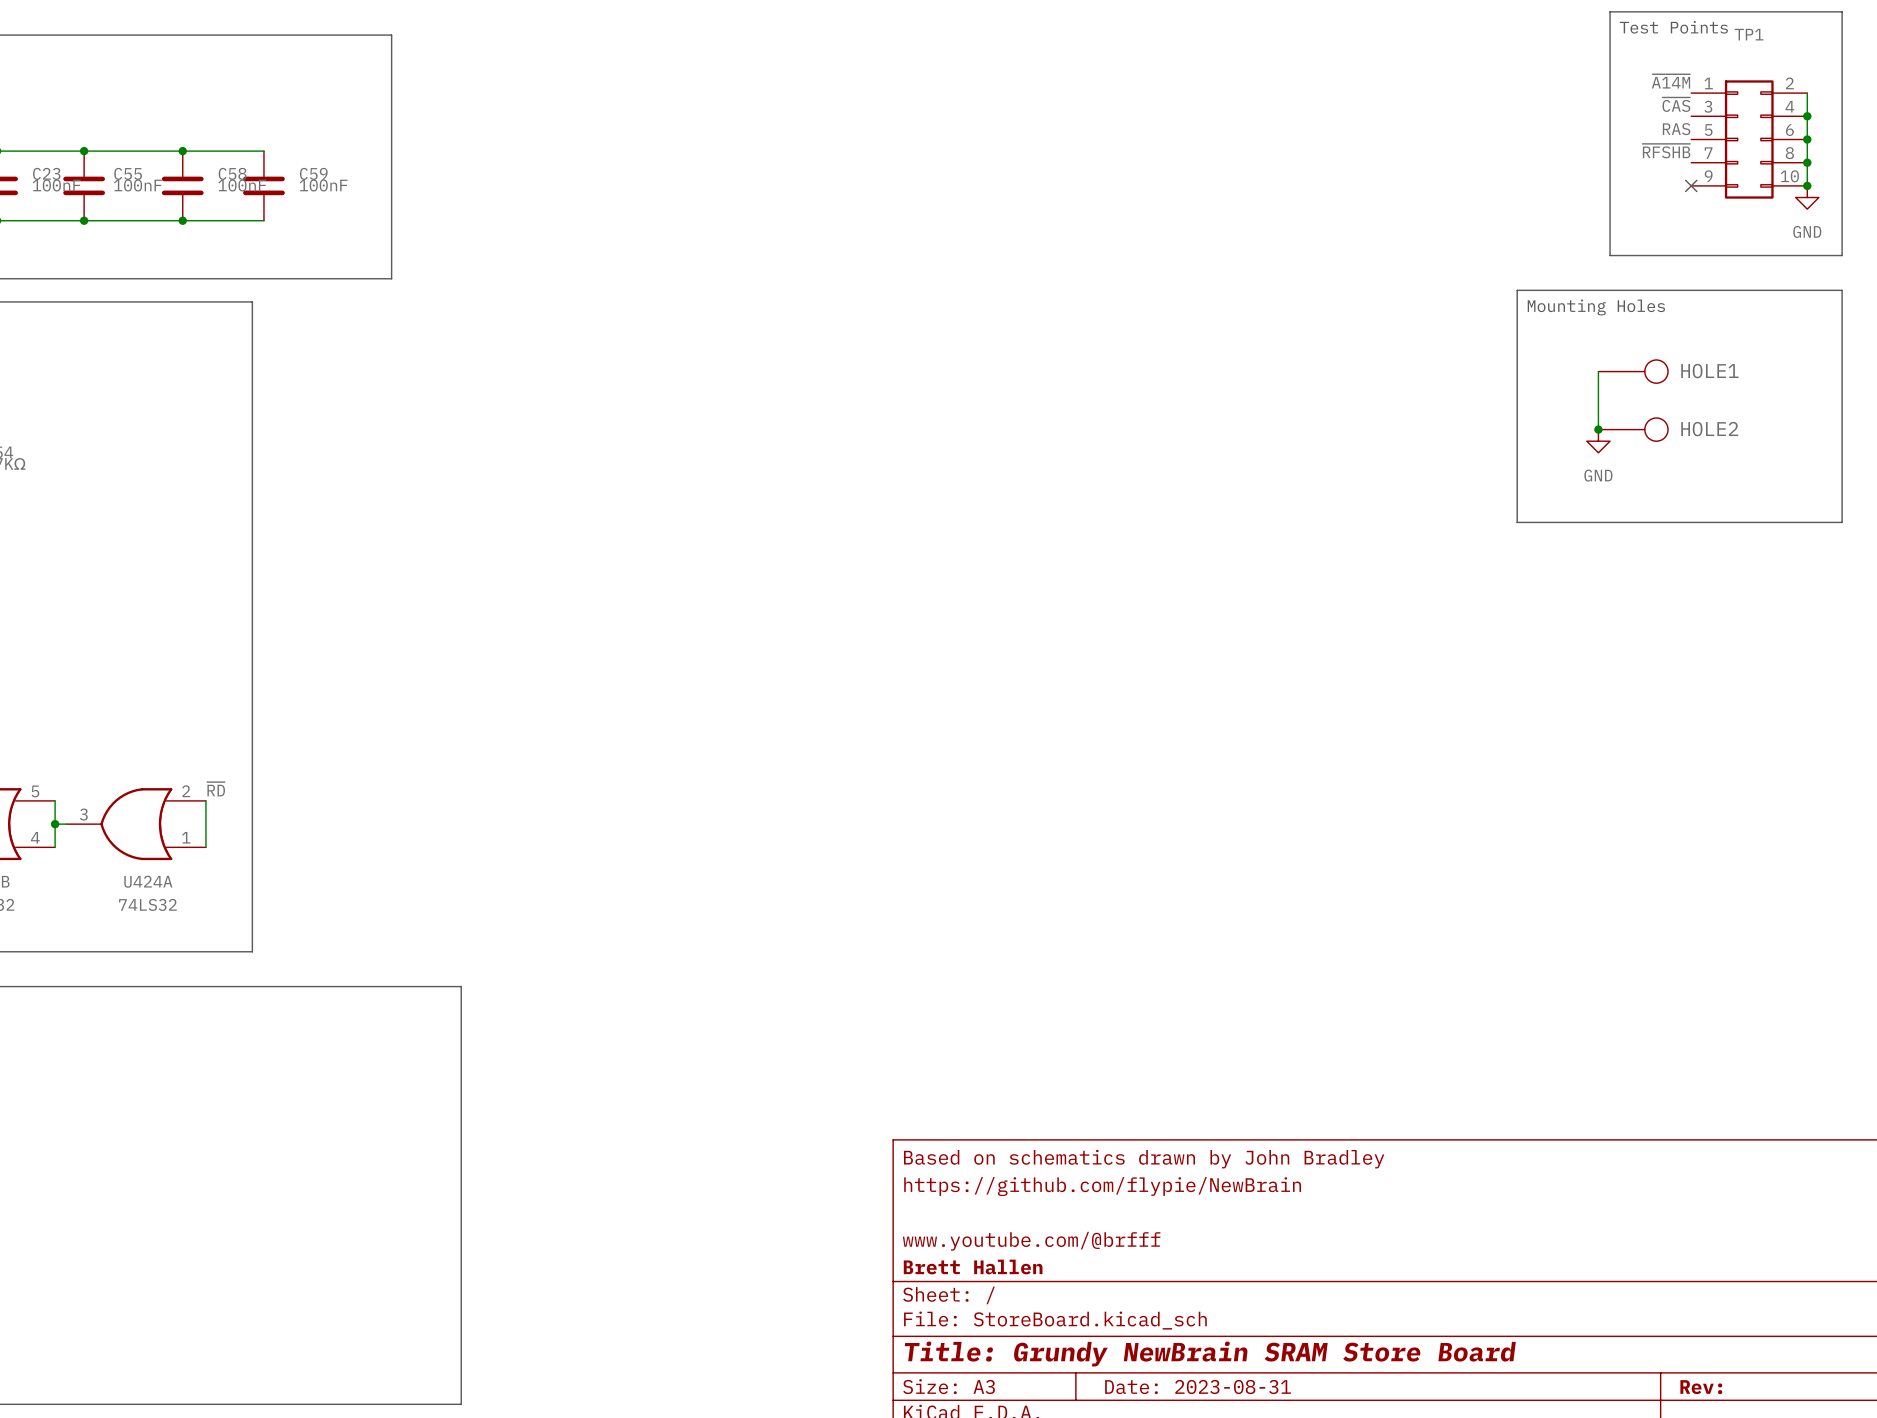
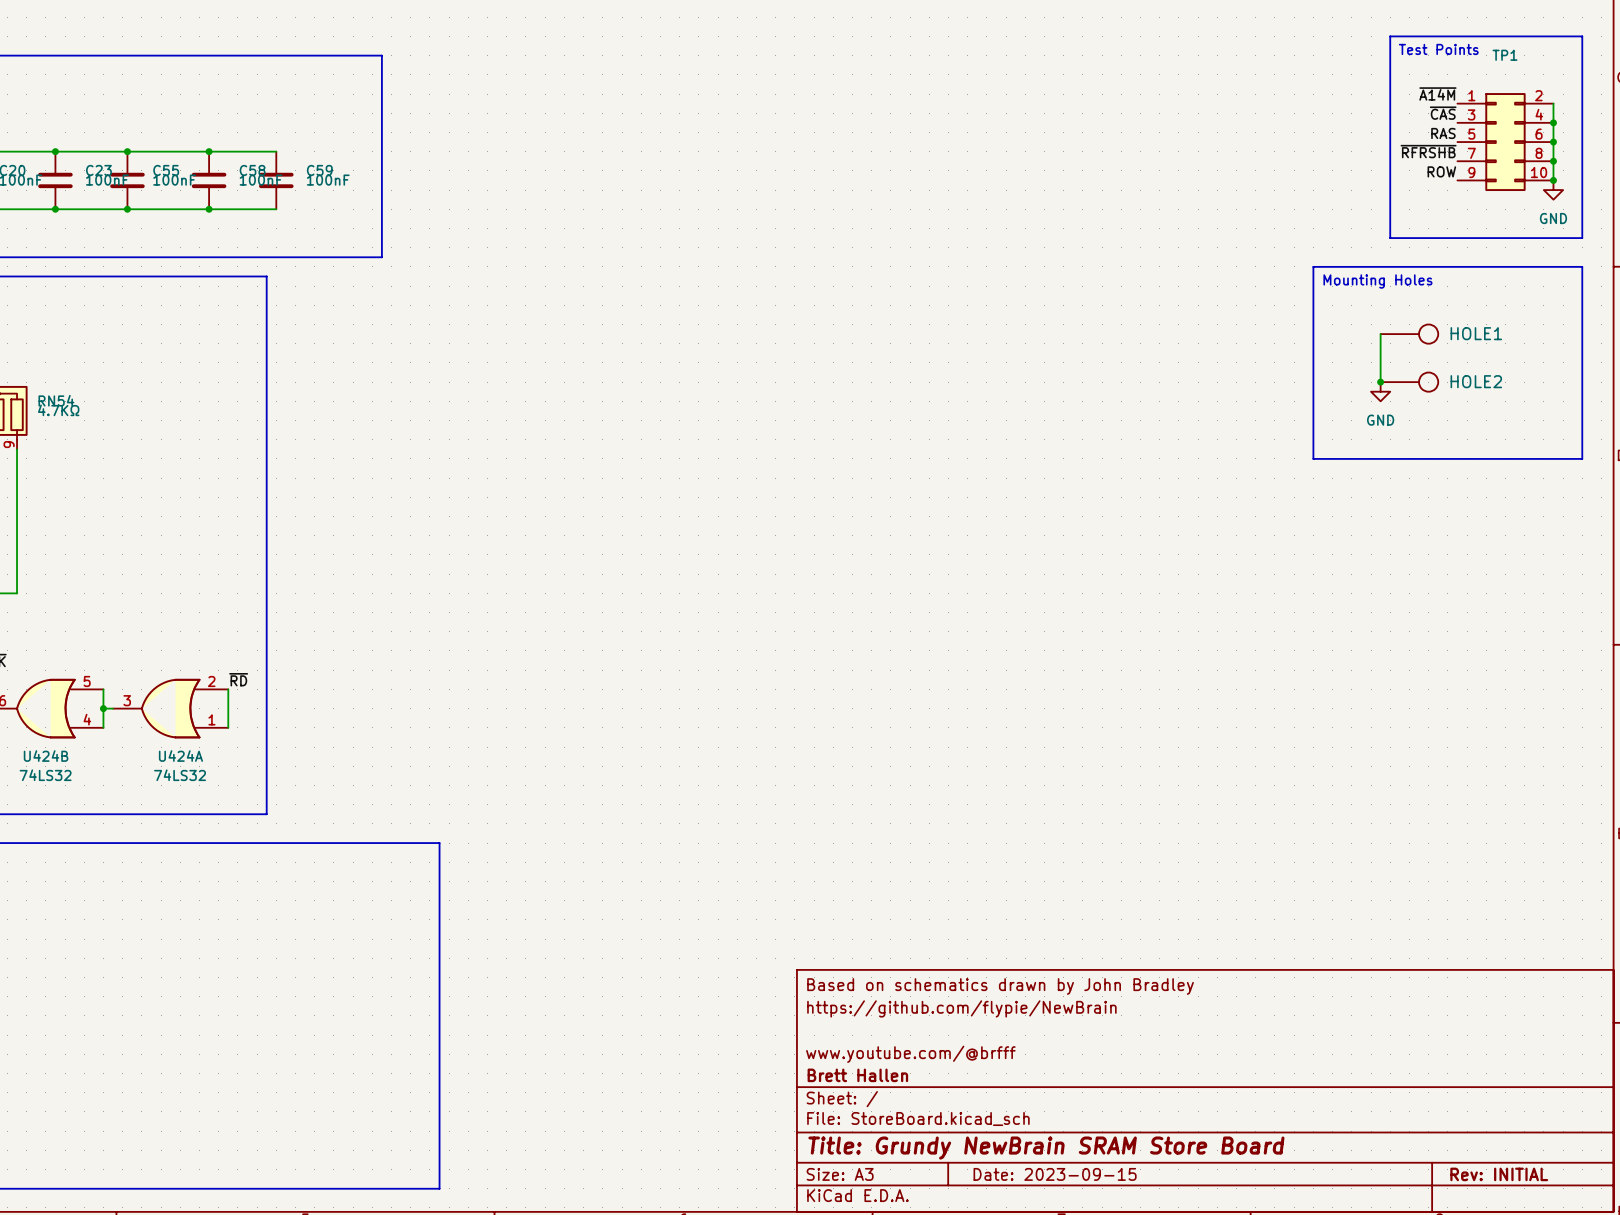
label: ~{RFSHB} (1666, 151) -> ~{RFRSHB} (1428, 151)
label: none -> ROW (1441, 171)
no-connect mark: (1691, 185) -> none
title block: Date: 2023-08-31 (1198, 1387) -> Date: 2023-09-15 (1055, 1174)
title block: Rev: (1701, 1387) -> Rev: INITIAL (1499, 1174)

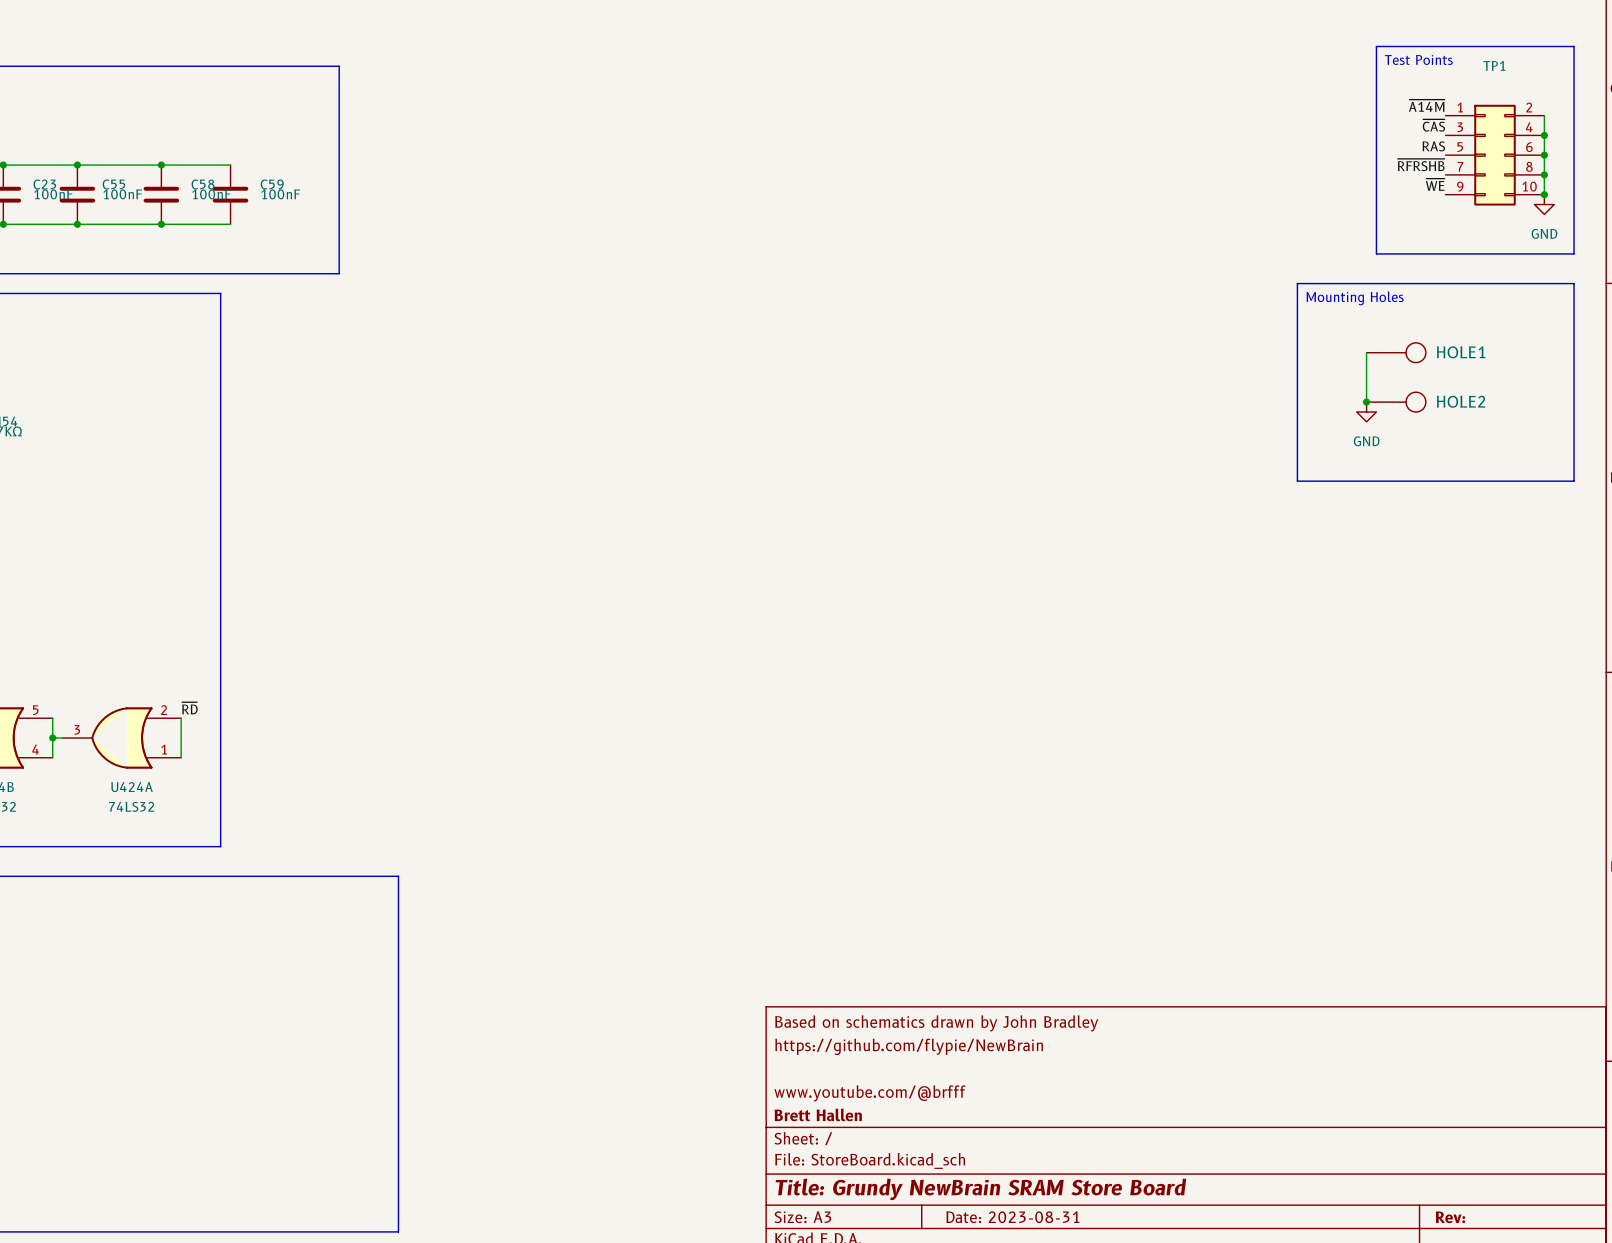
label: ROW (1441, 171) -> ~{WE} (1435, 184)
title block: Date: 2023-09-15 (1055, 1174) -> Date: 2023-08-31 (1012, 1217)
title block: Rev: INITIAL (1499, 1174) -> Rev: (1450, 1217)

